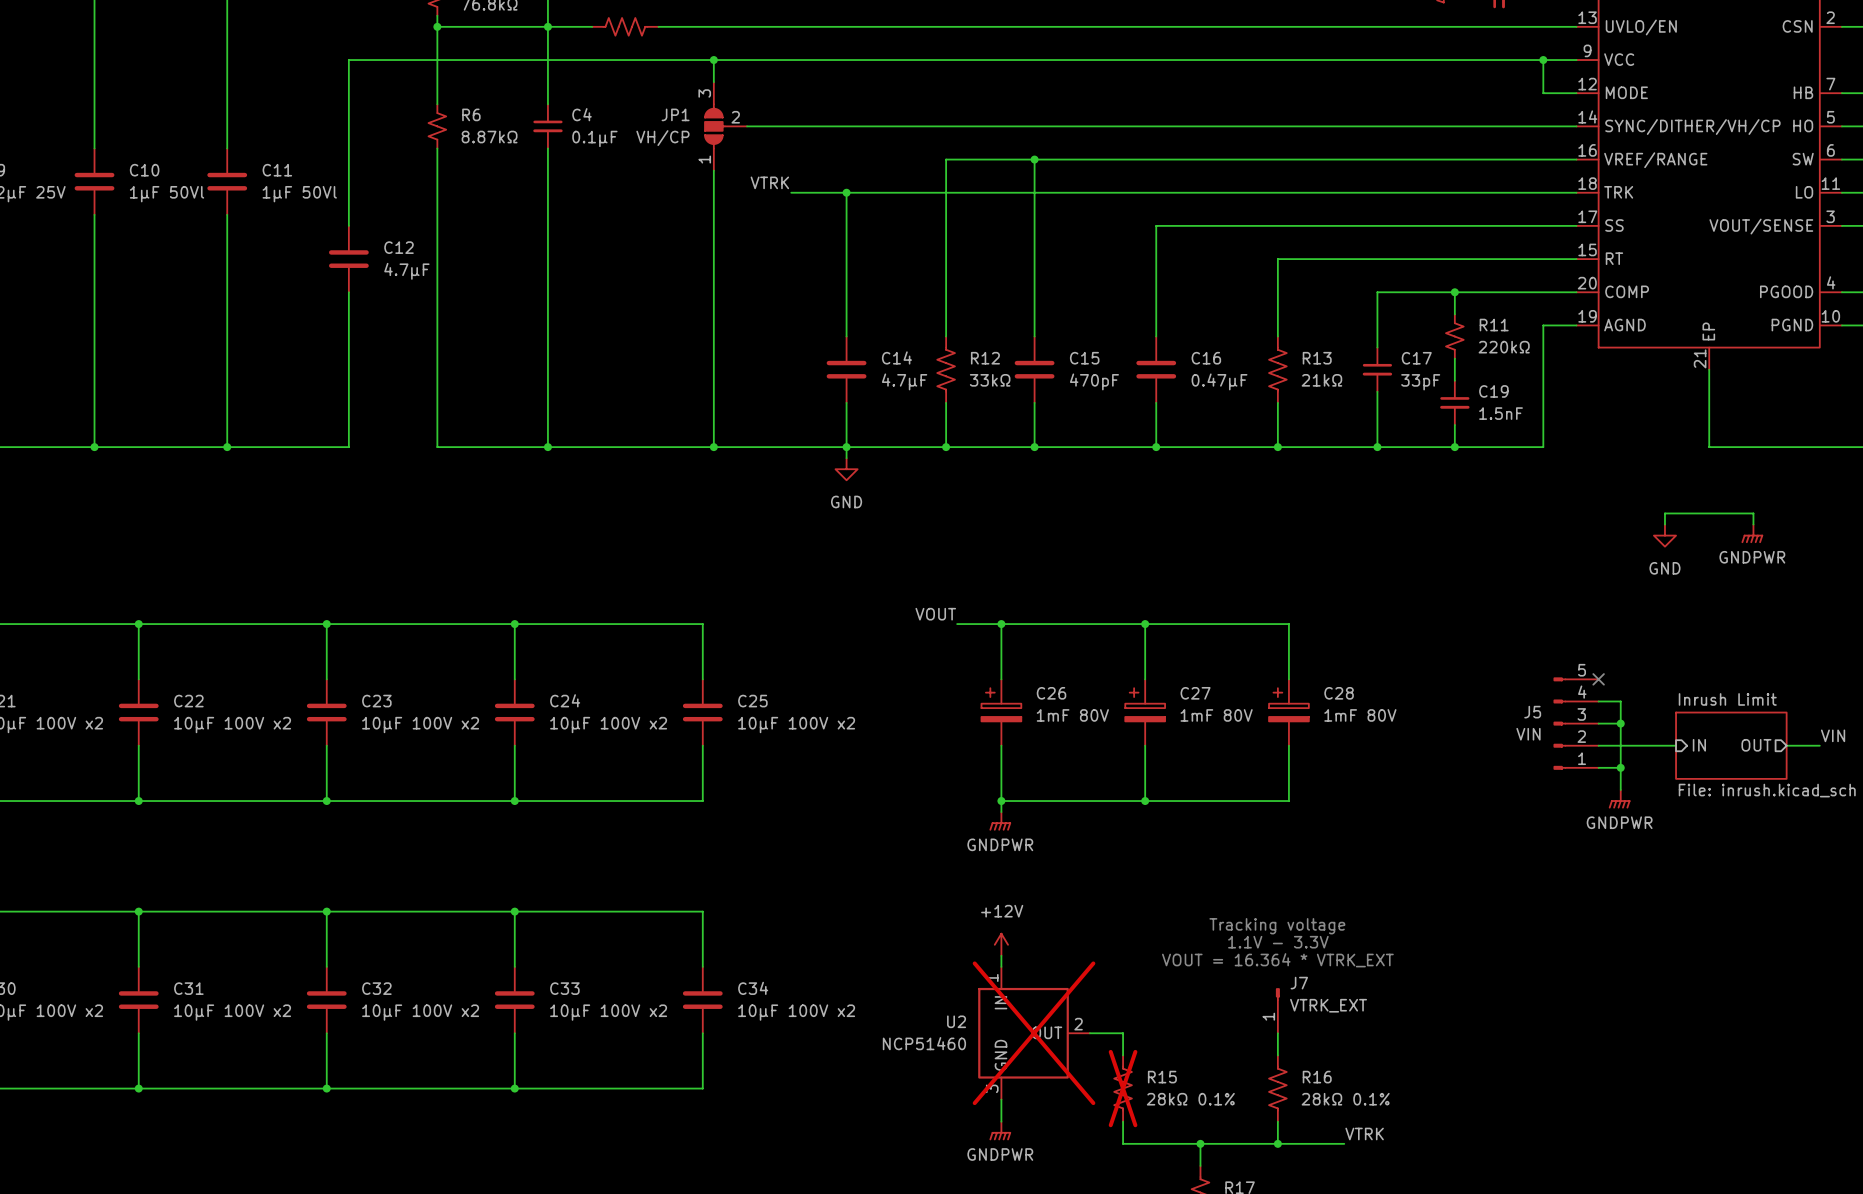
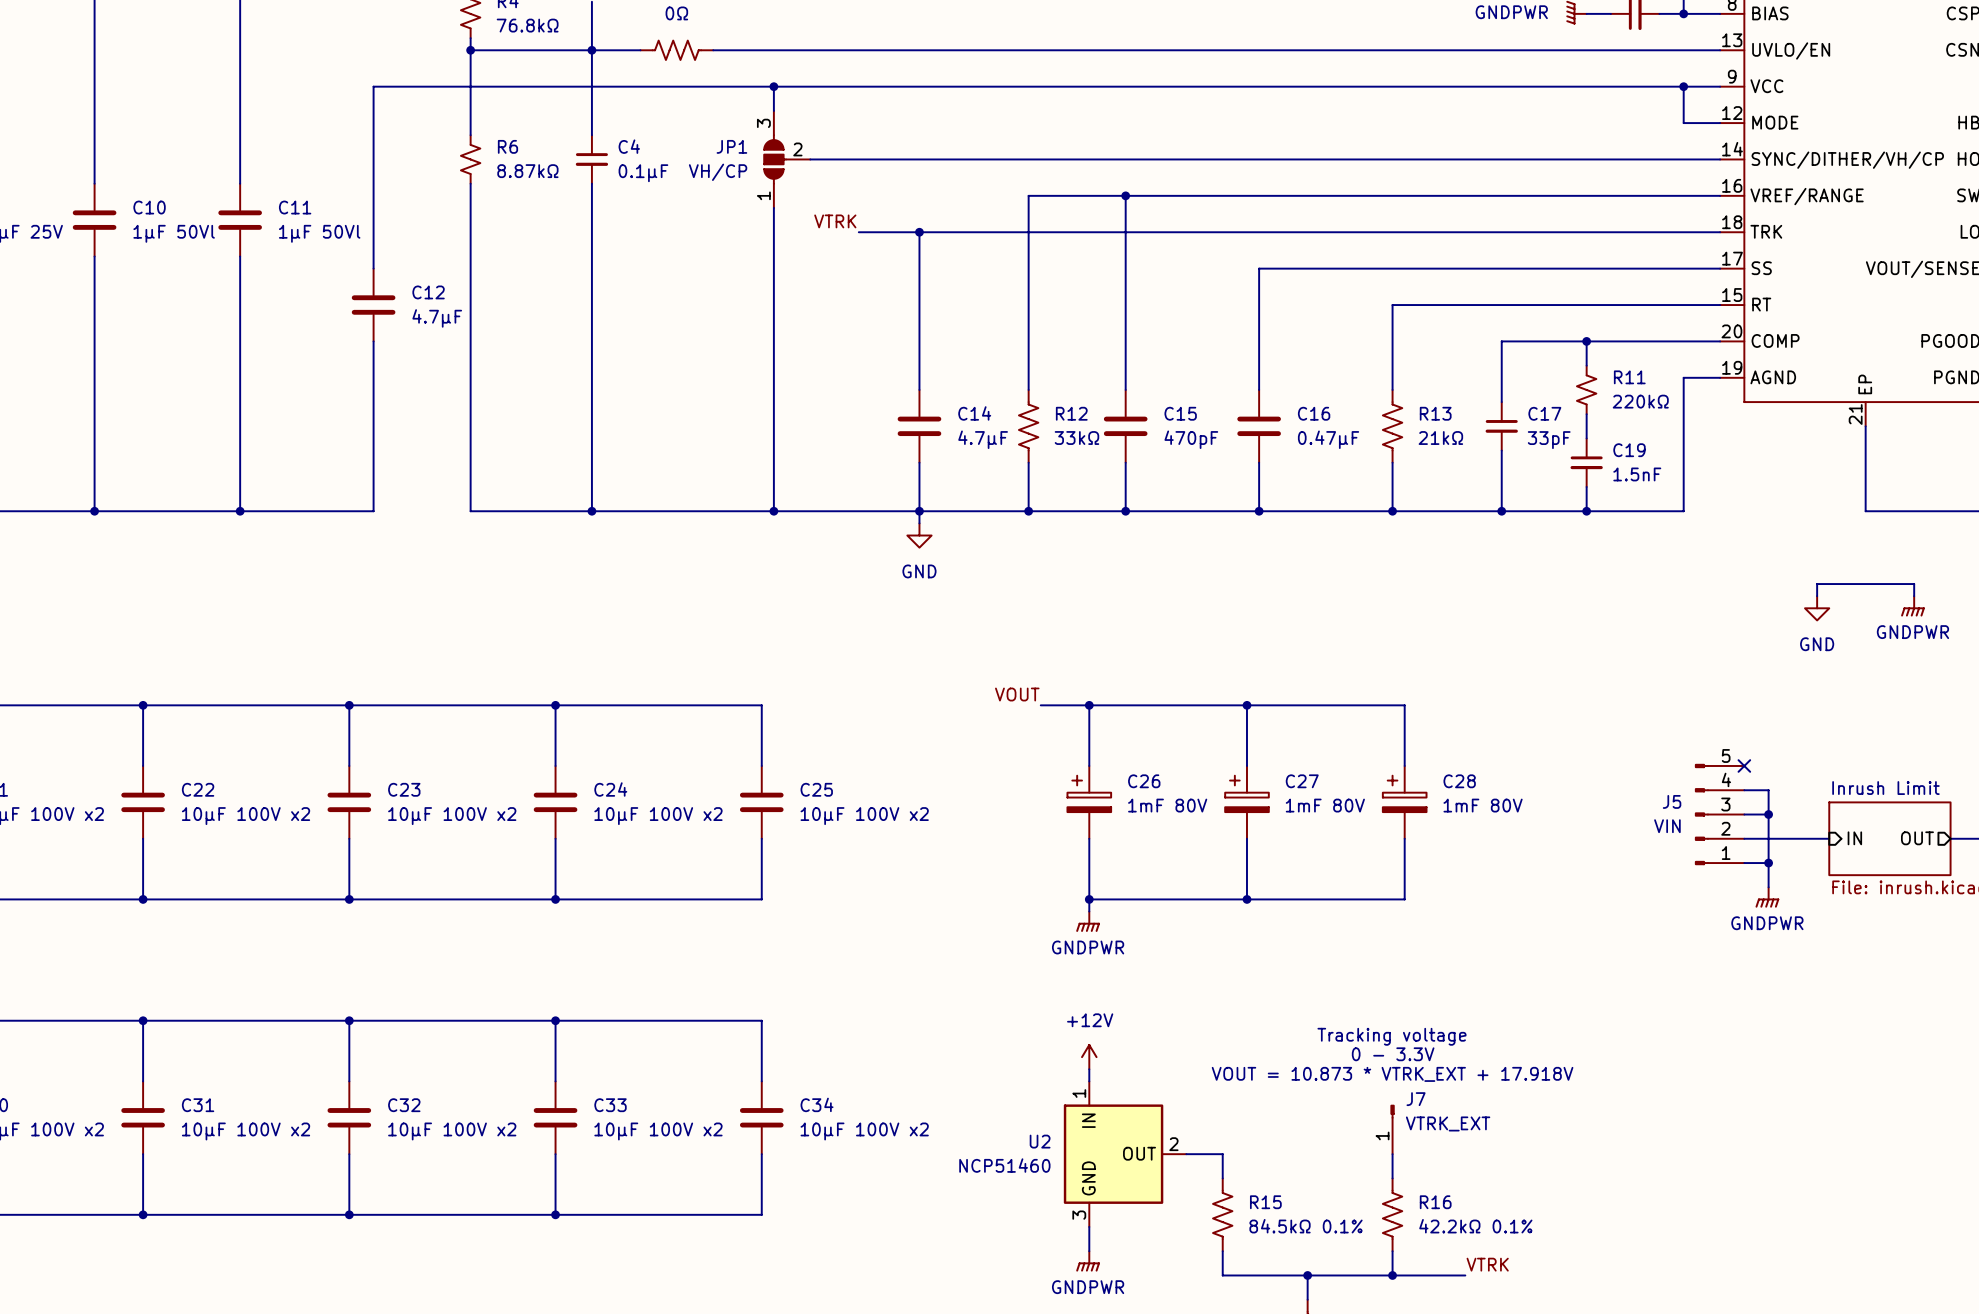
text: 1.1V - 3.3V (1278, 942) -> 0 - 3.3V (1393, 1054)
text: VOUT = 16.364 * VTRK_EXT (1277, 960) -> VOUT = 10.873 * VTRK_EXT + 17.918V (1392, 1074)
U2 do-not-place cross: (1034, 1033) -> none
R15 do-not-place cross: (1123, 1088) -> none
R15 value: 28kΩ 0.1% (1190, 1099) -> 84.5kΩ 0.1% (1306, 1226)
R16 value: 28kΩ 0.1% (1345, 1099) -> 42.2kΩ 0.1% (1475, 1226)

